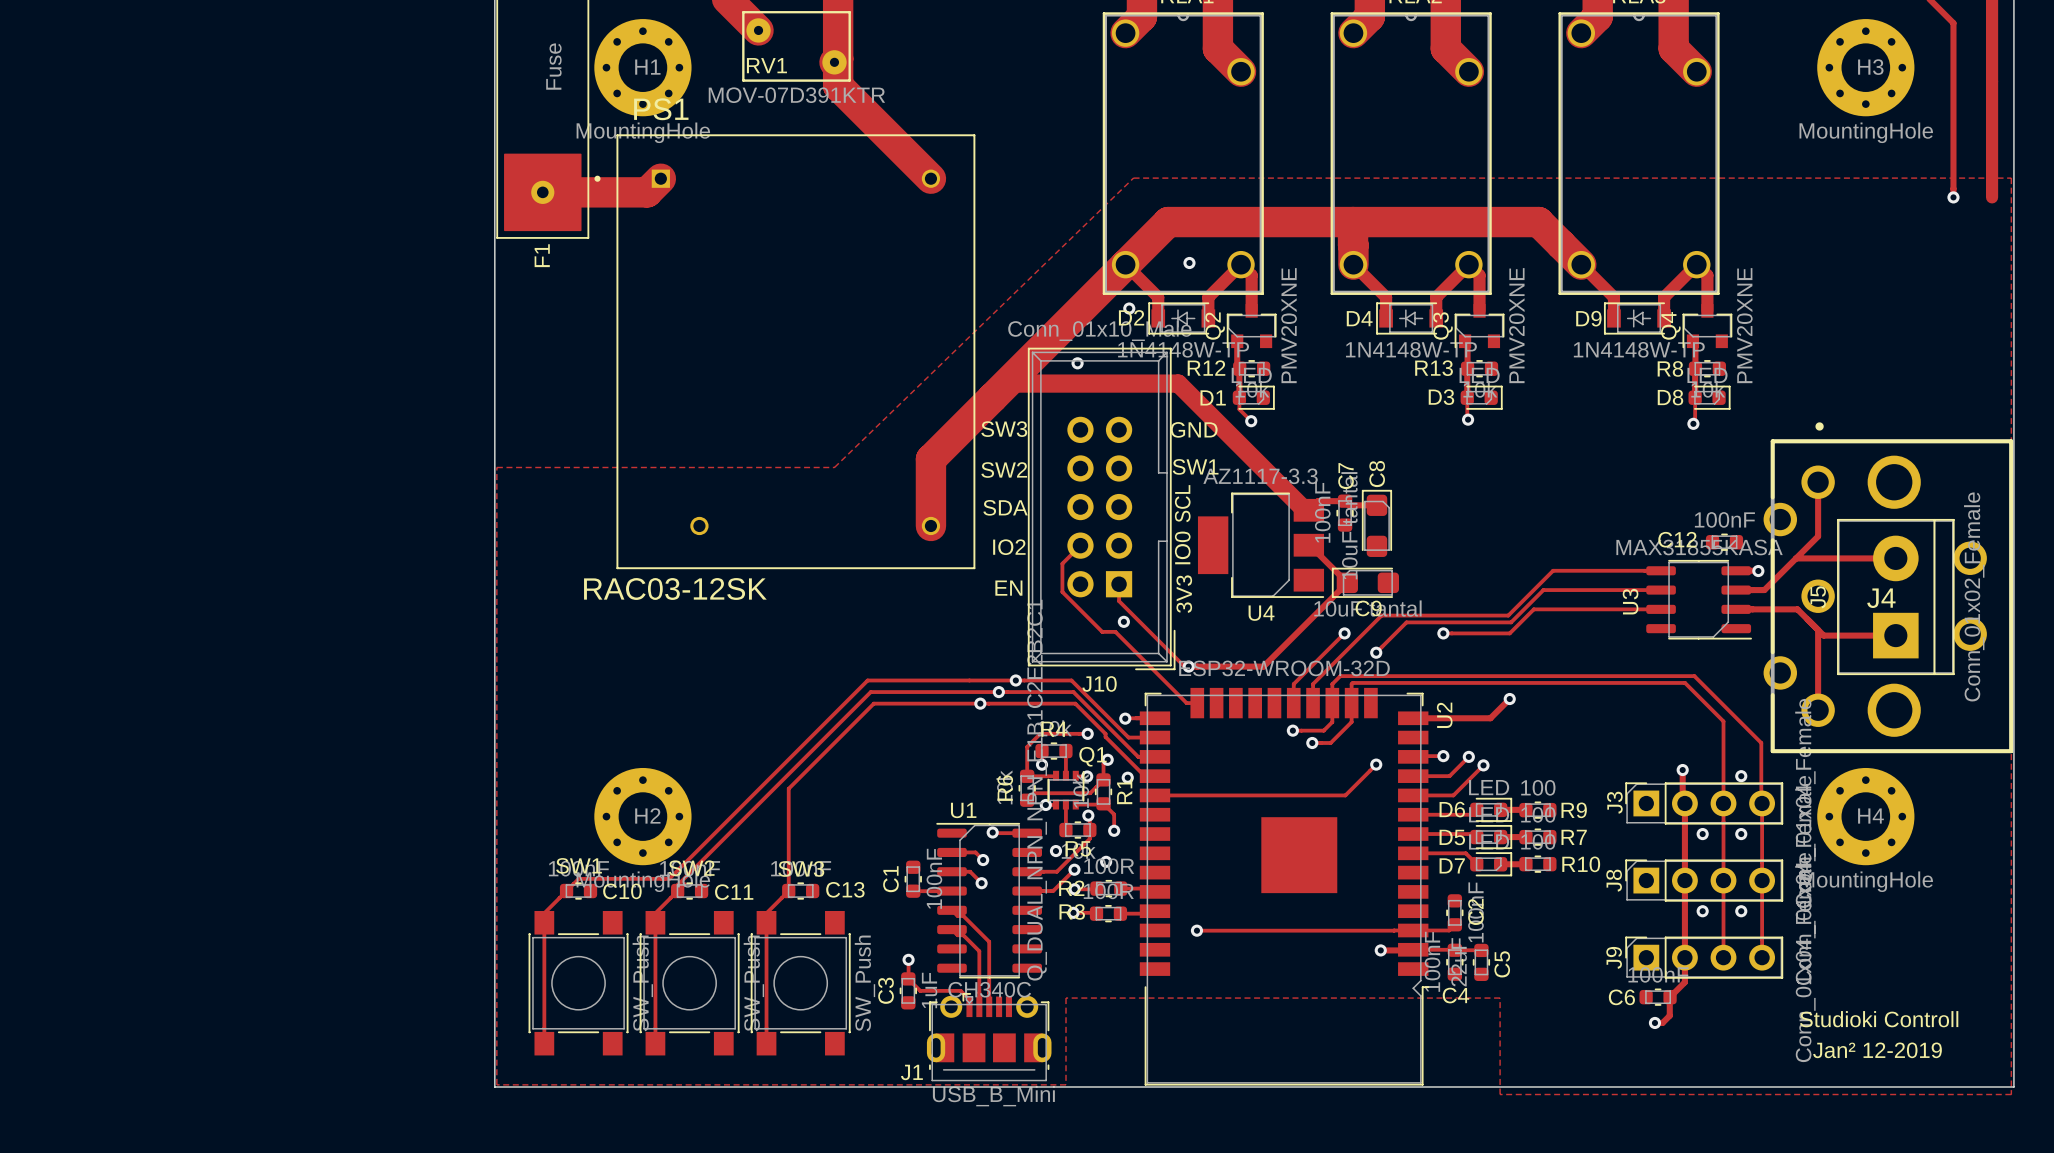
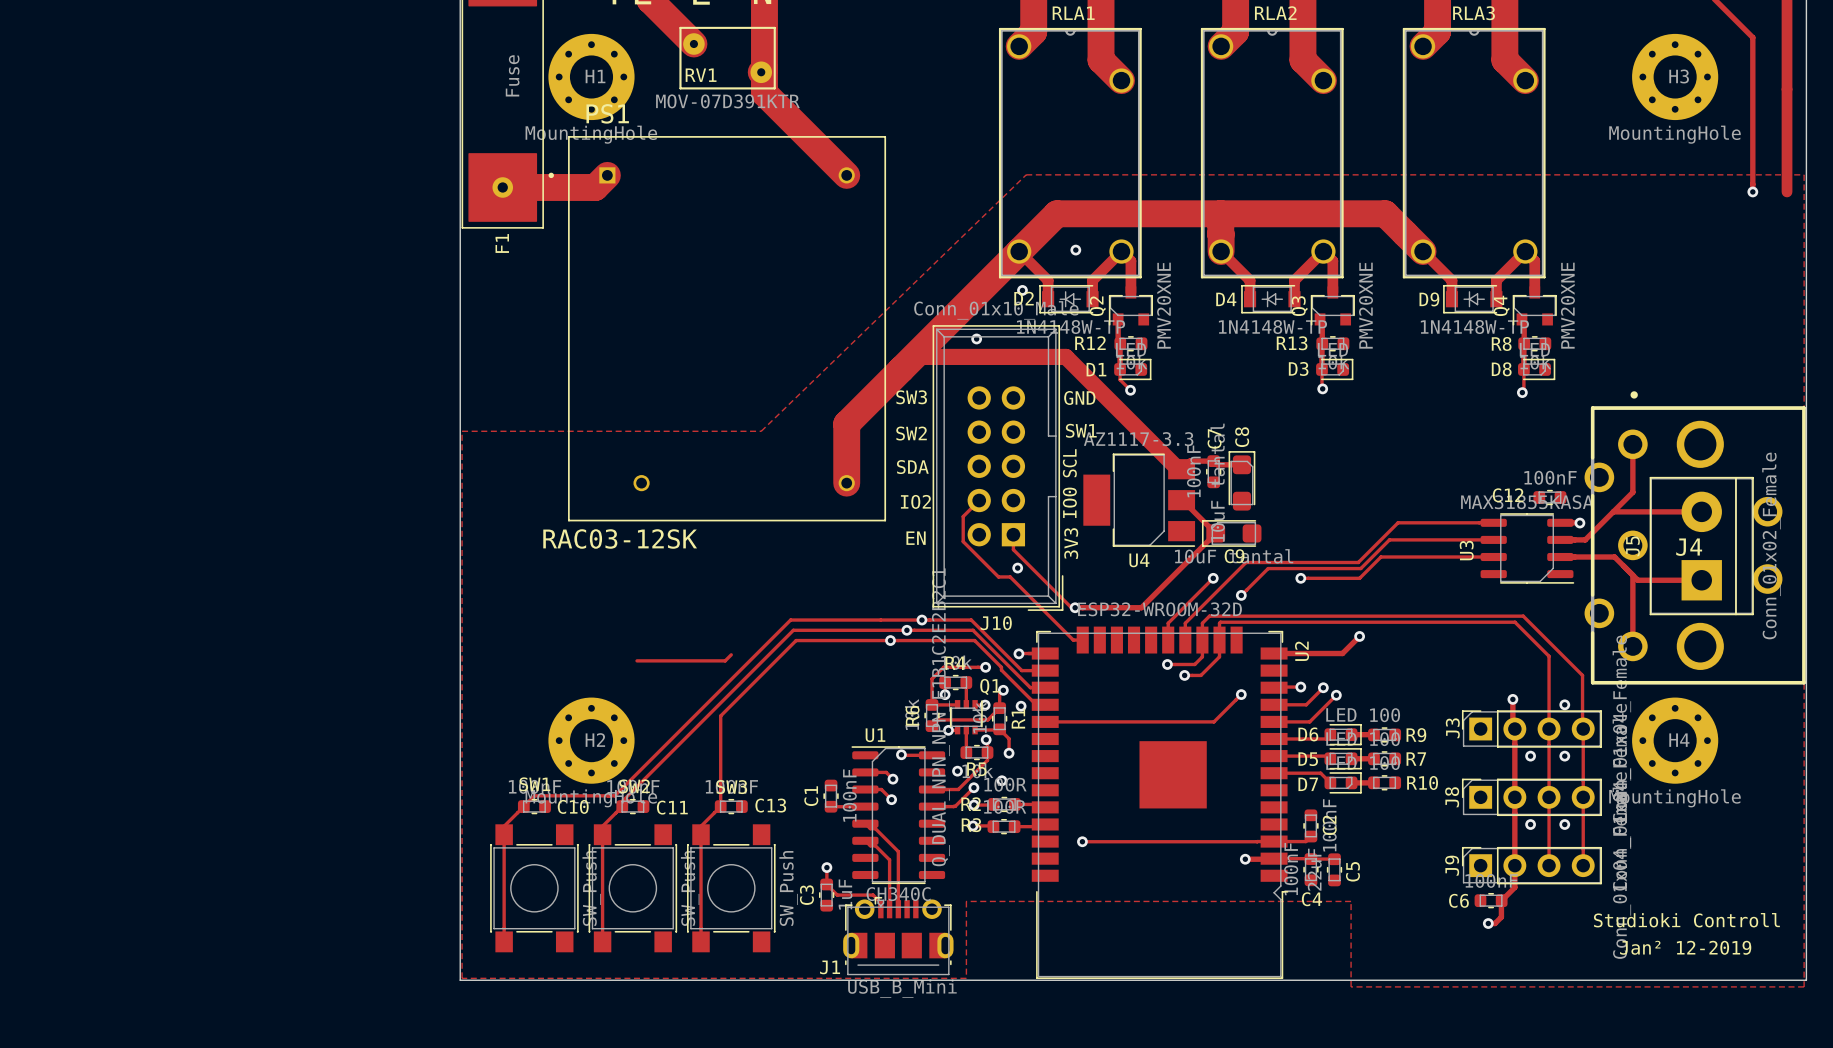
track: none -> (731, 654) (725, 660) (637, 660)

